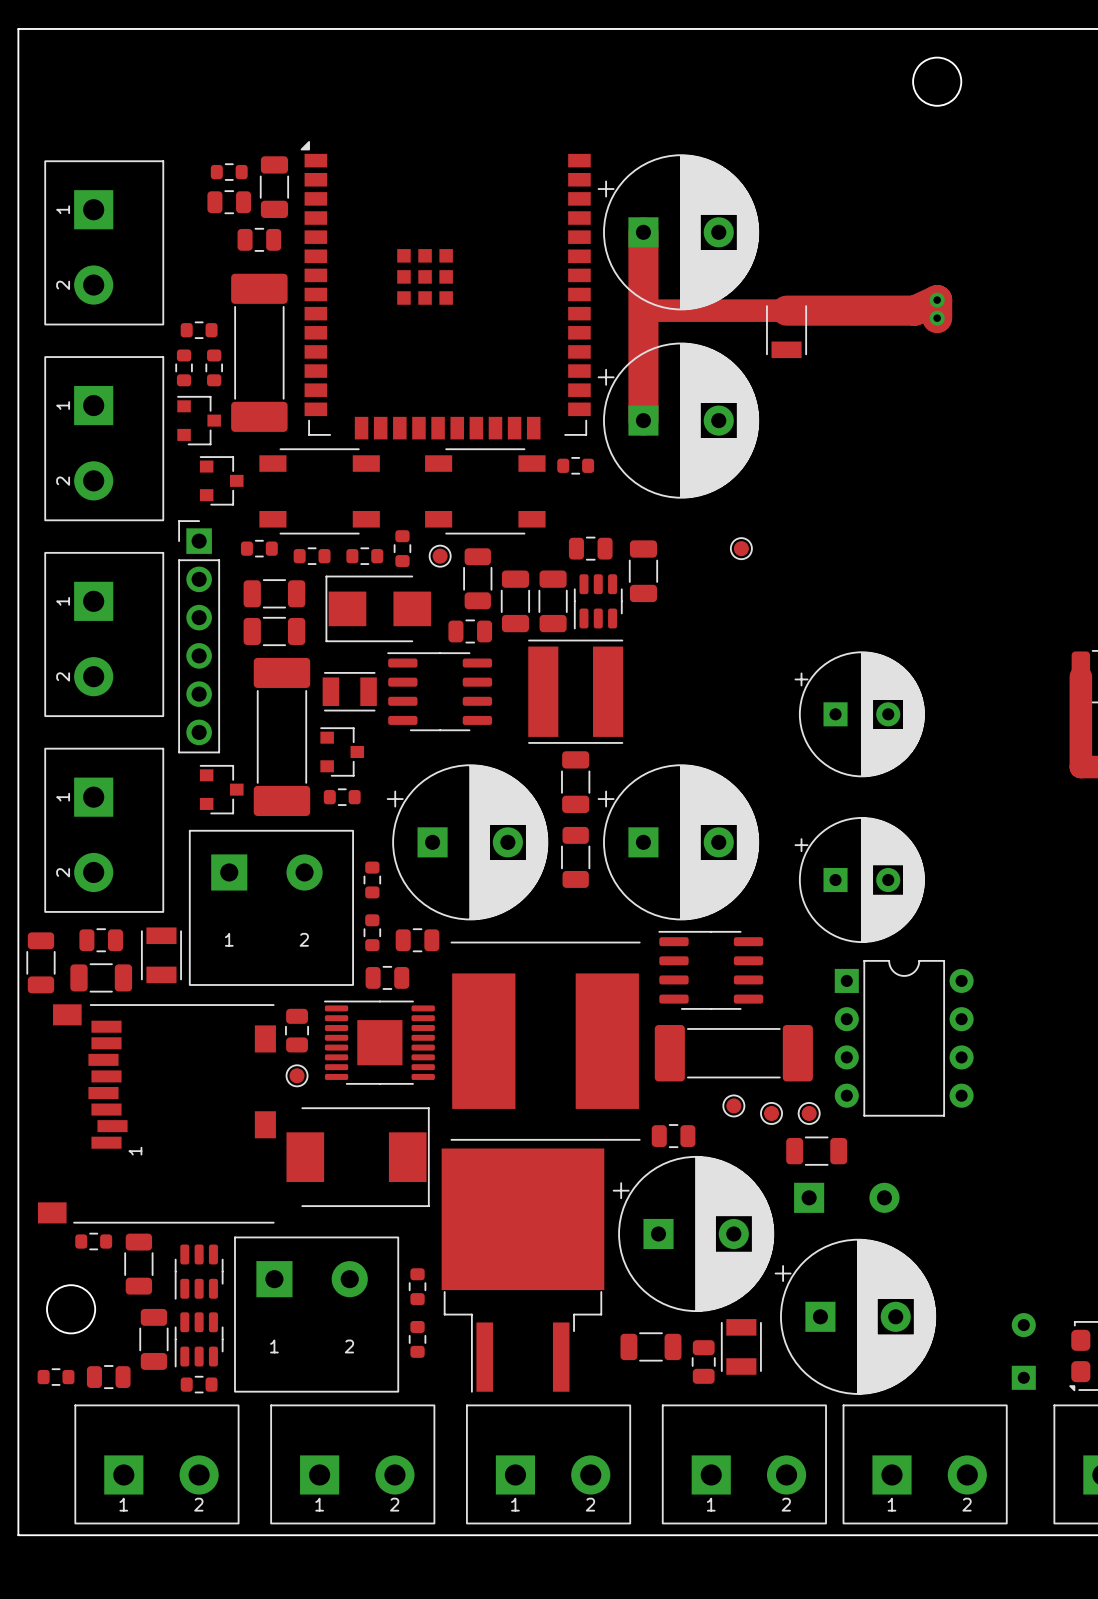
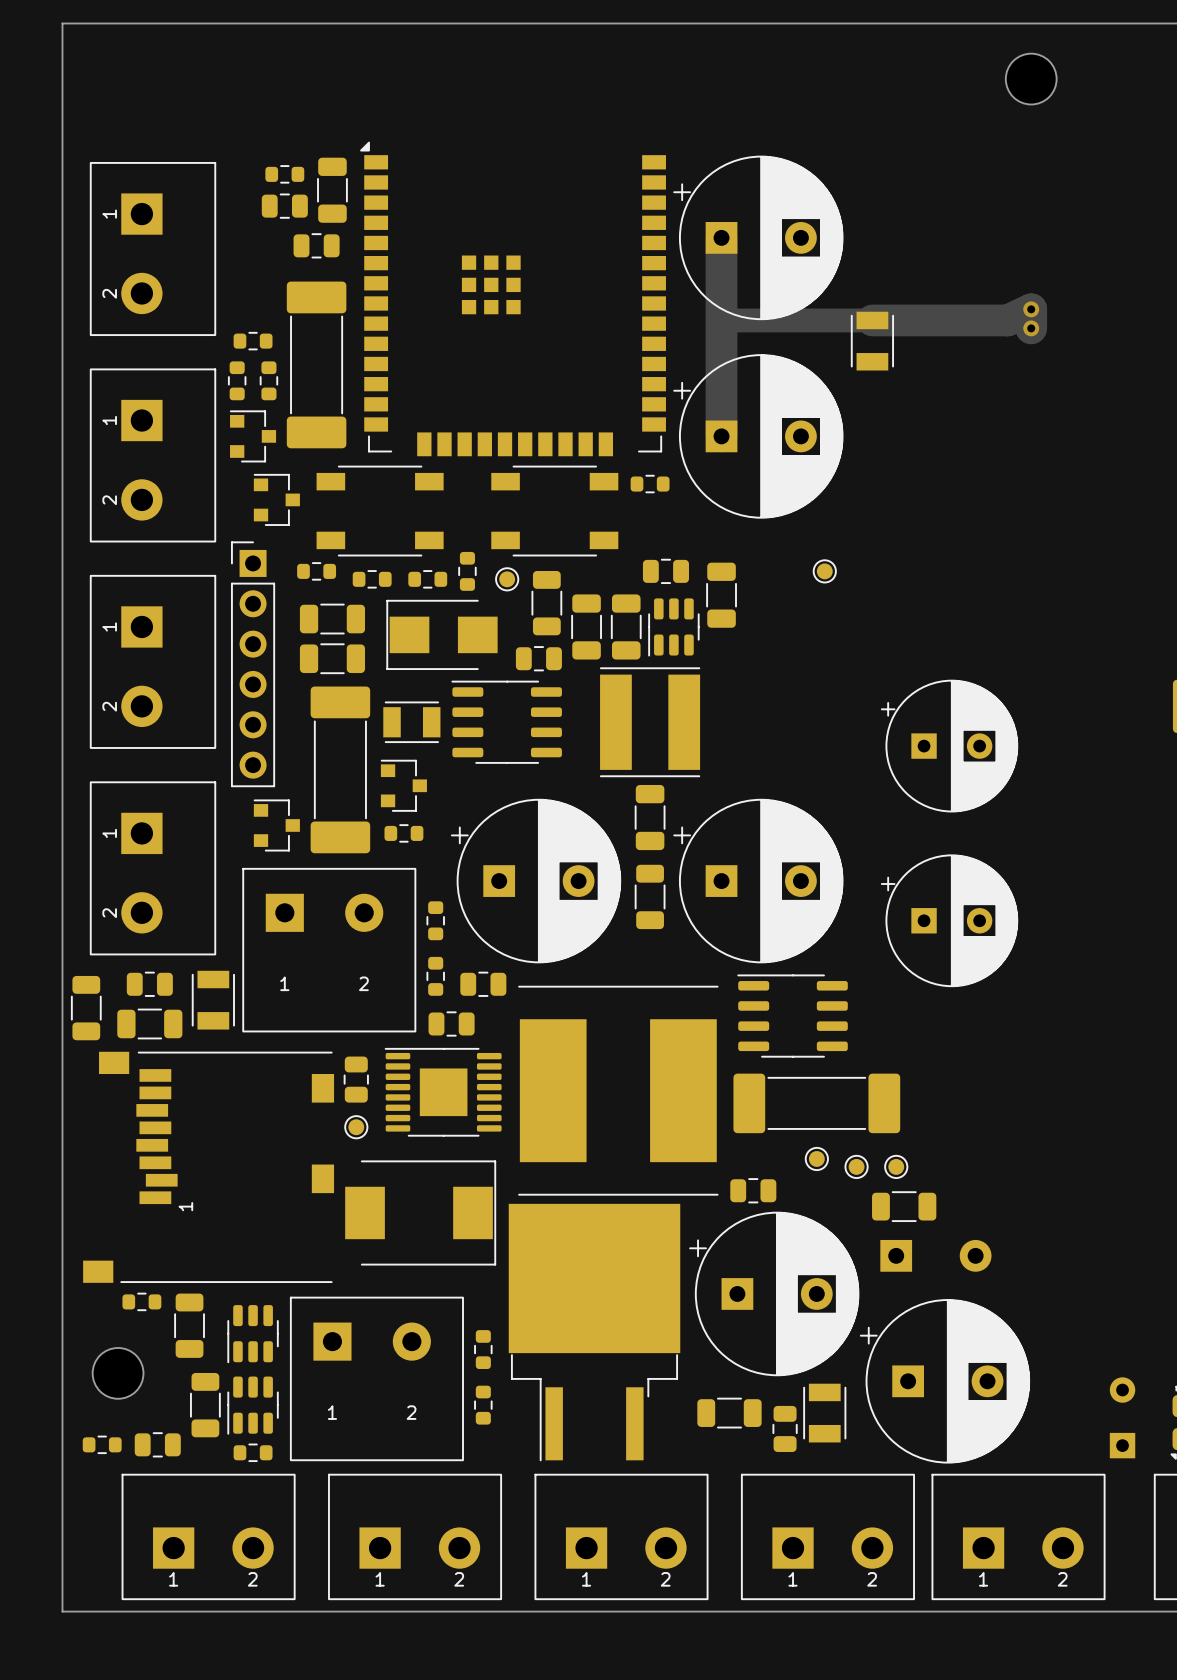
part: (904, 1038) -> none

